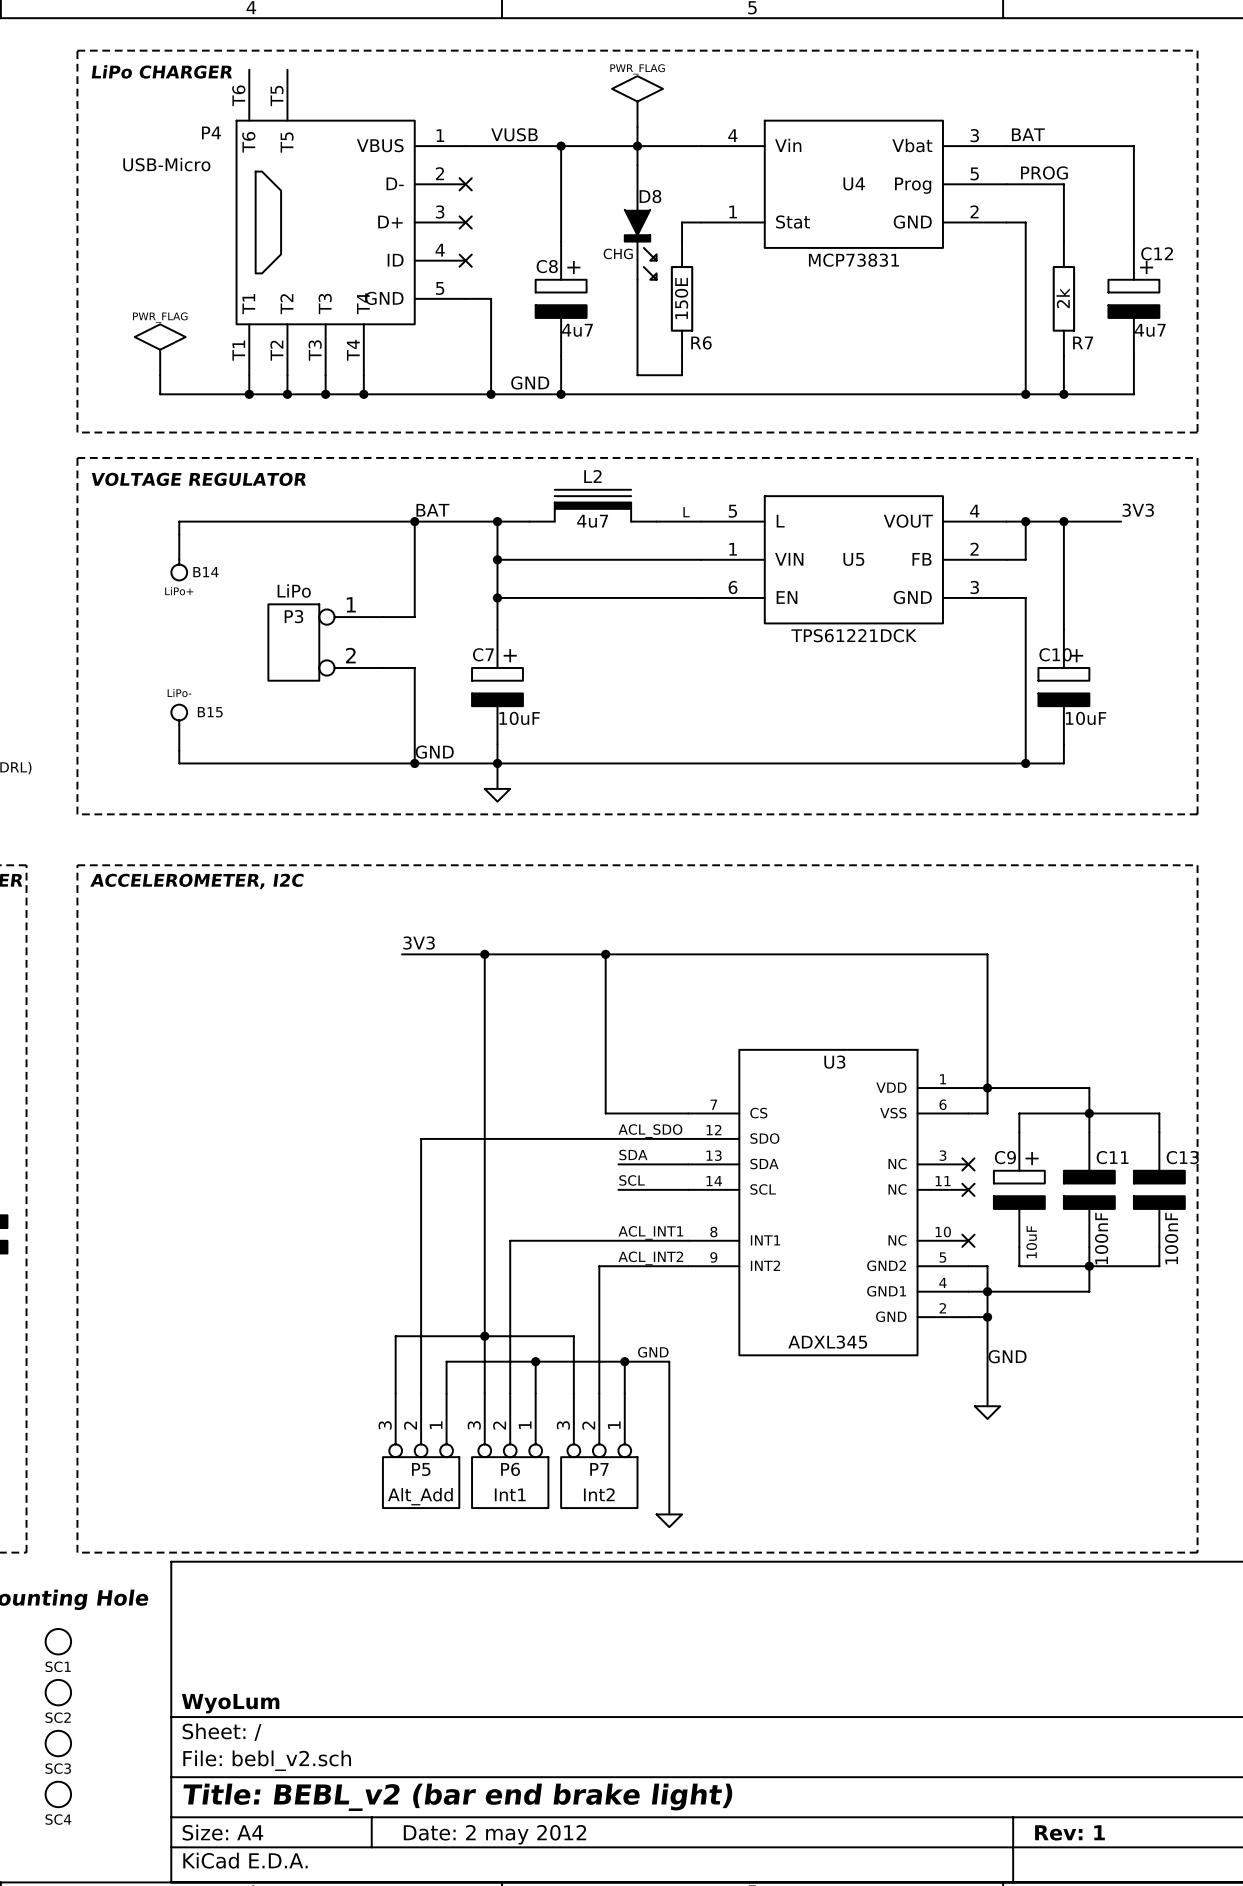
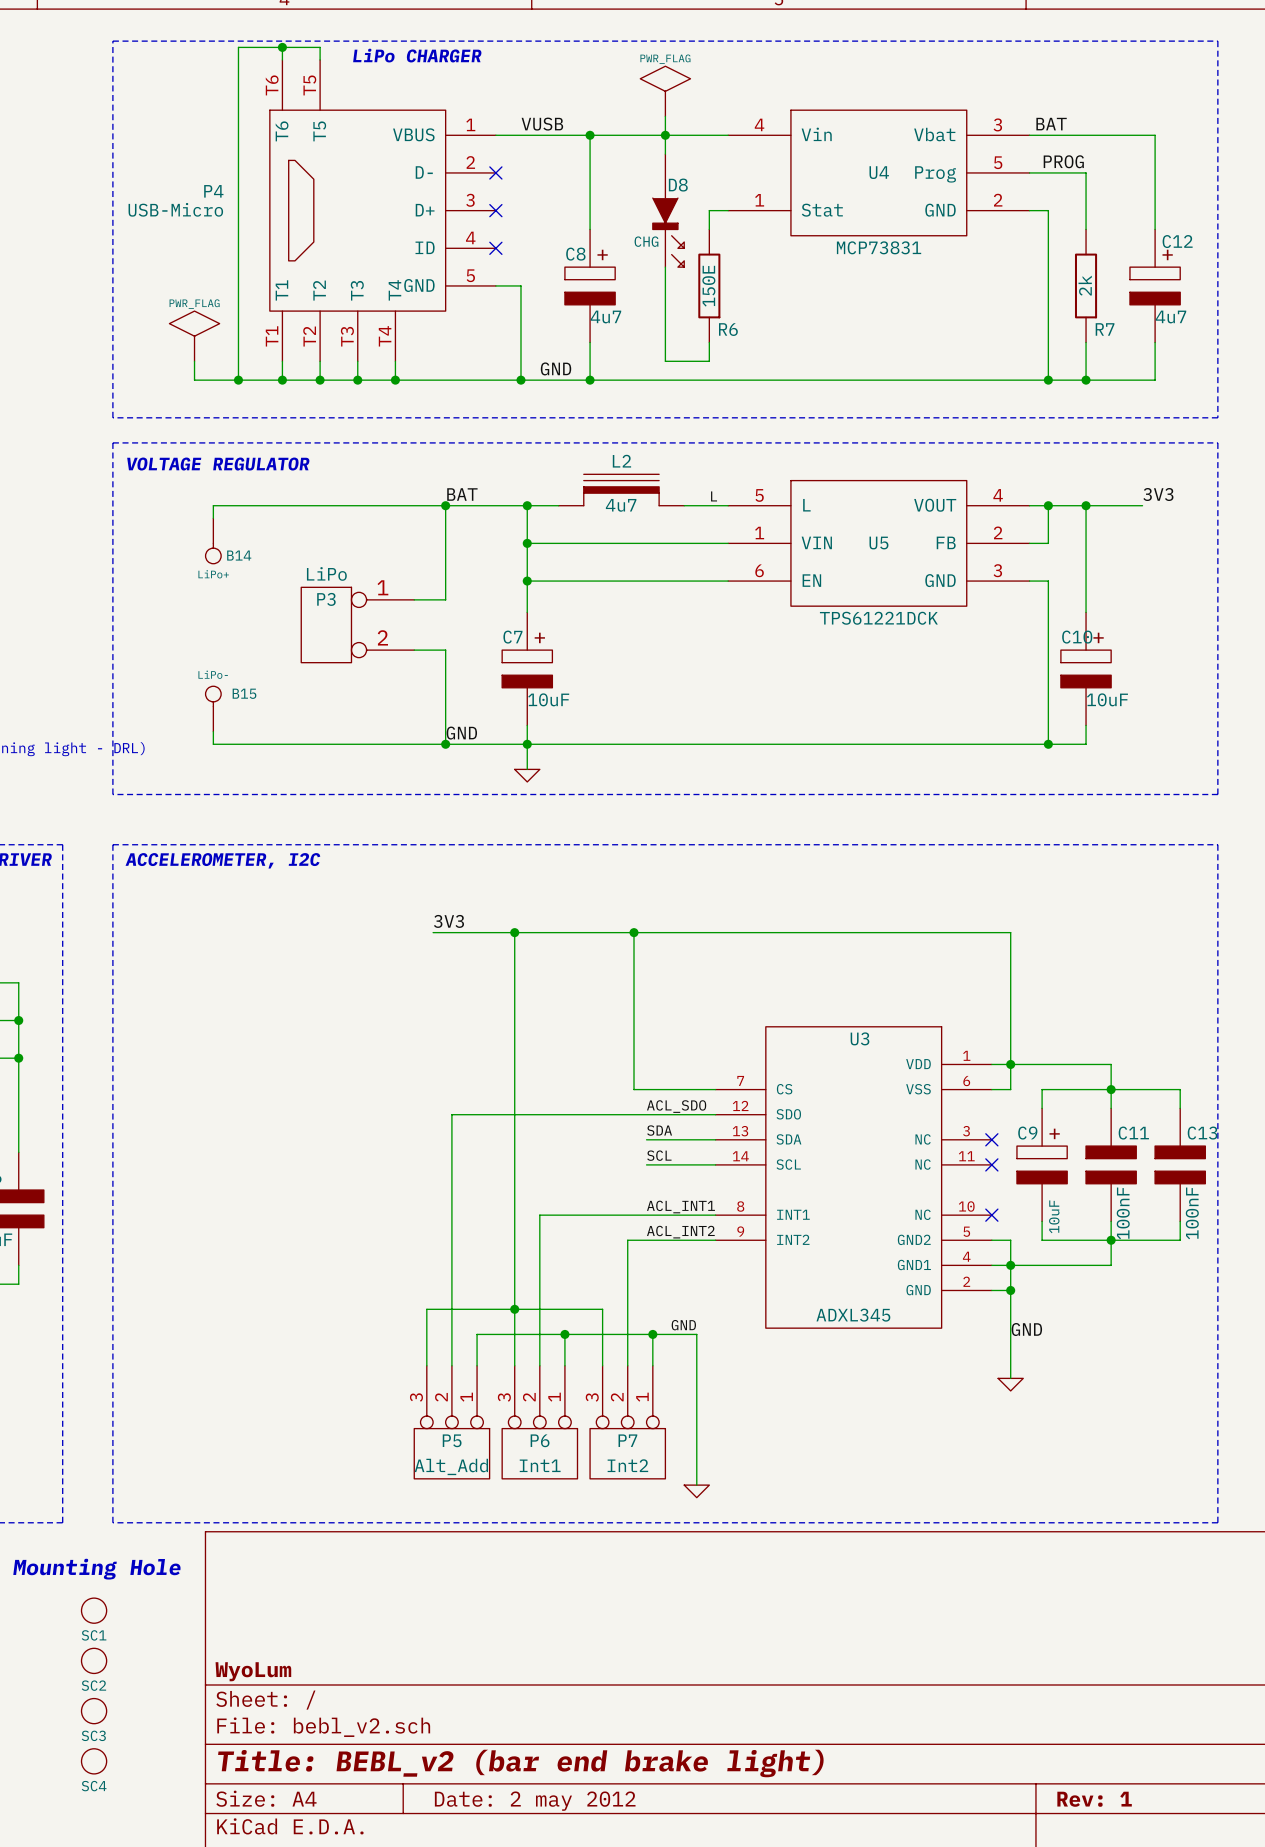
wire: none -> (282, 47) (282, 59)
junction: none -> (282, 47)
wire: none -> (320, 59) (320, 47) (238, 47) (238, 380)
text position: LiPo CHARGER (161, 71) -> LiPo CHARGER (417, 55)
P4 name position: P4 (211, 132) -> P4 (213, 191)
P4 value position: USB-Micro (166, 164) -> USB-Micro (175, 209)
junction: none -> (238, 380)

